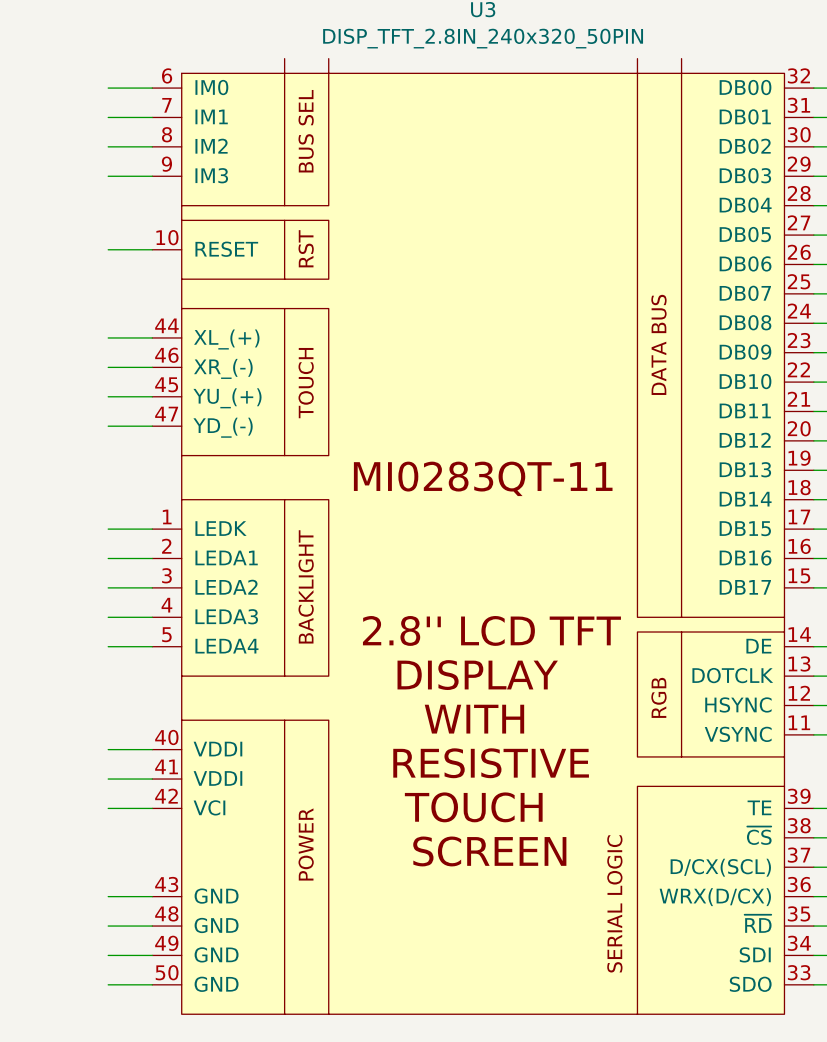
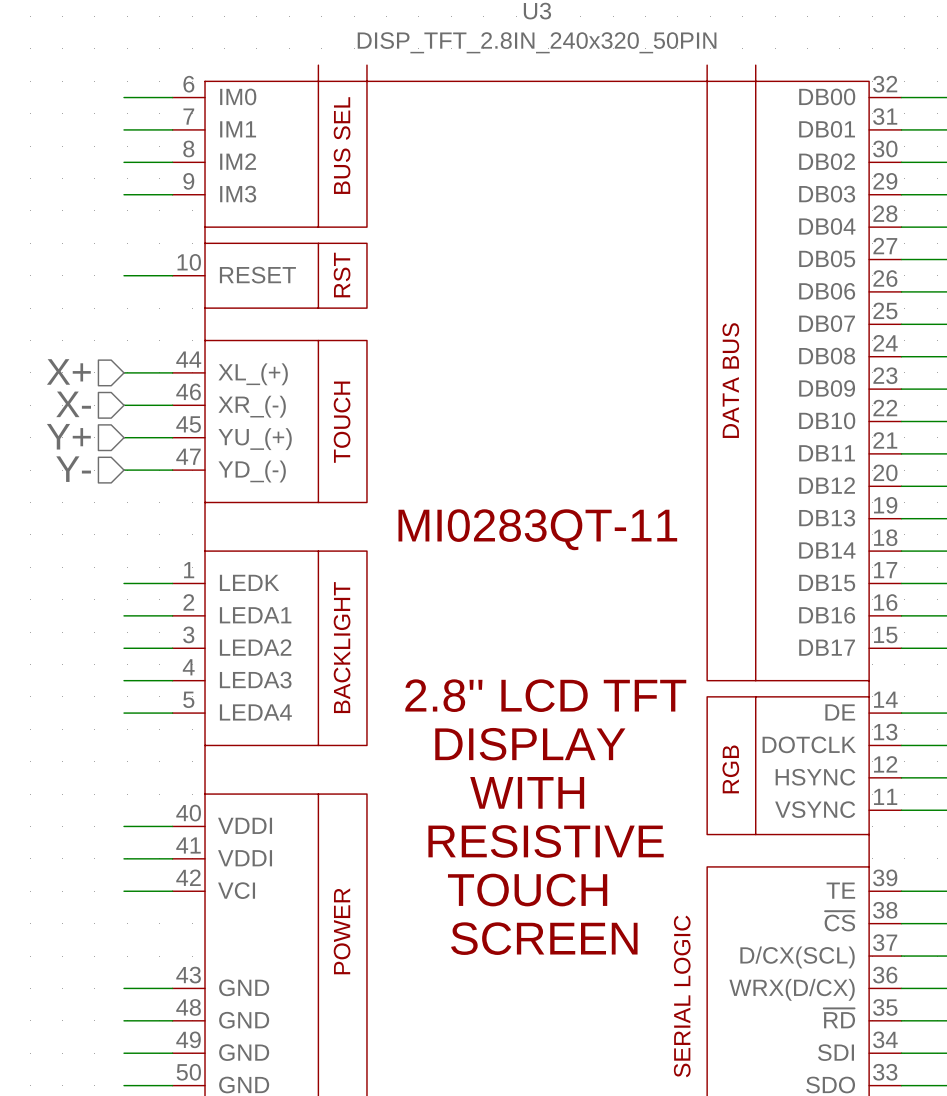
hierarchical label: none -> X+ (68, 371)
hierarchical label: none -> X- (73, 404)
hierarchical label: none -> Y+ (68, 436)
hierarchical label: none -> Y- (73, 469)

